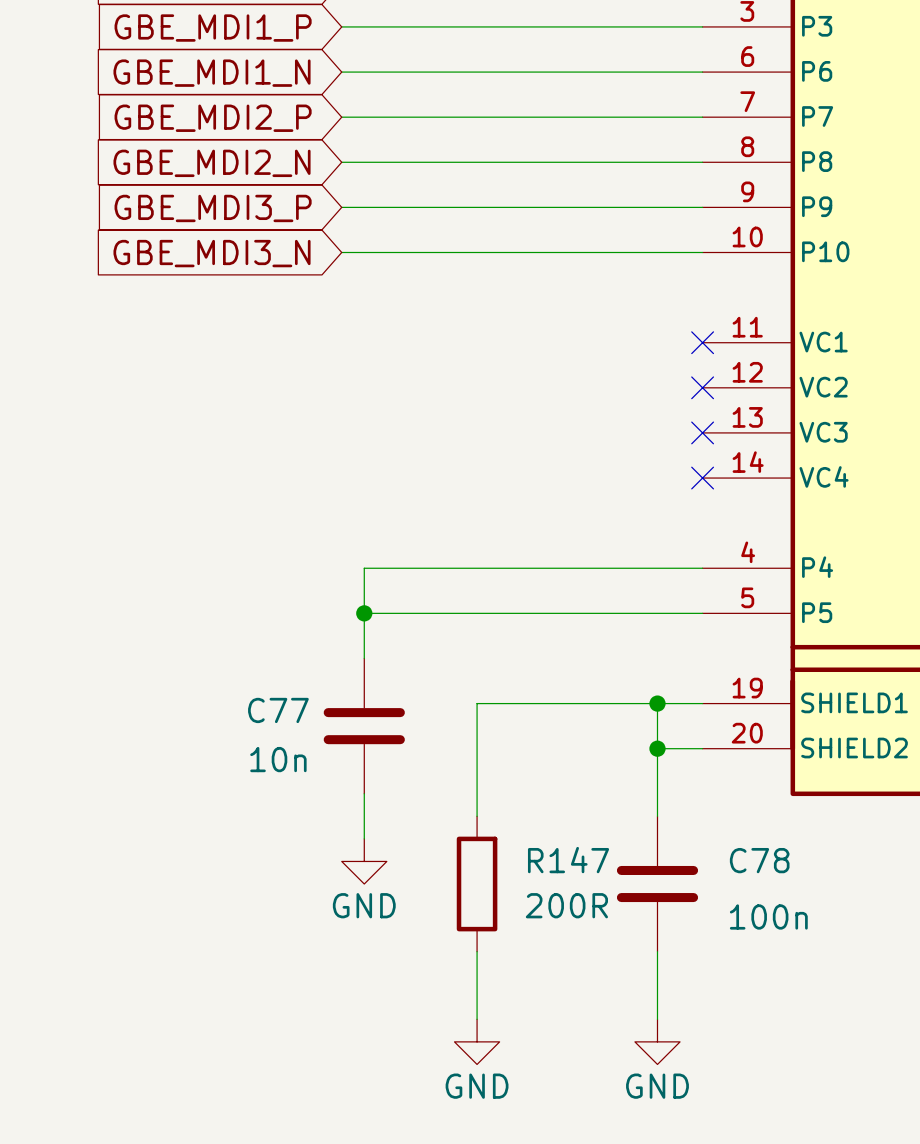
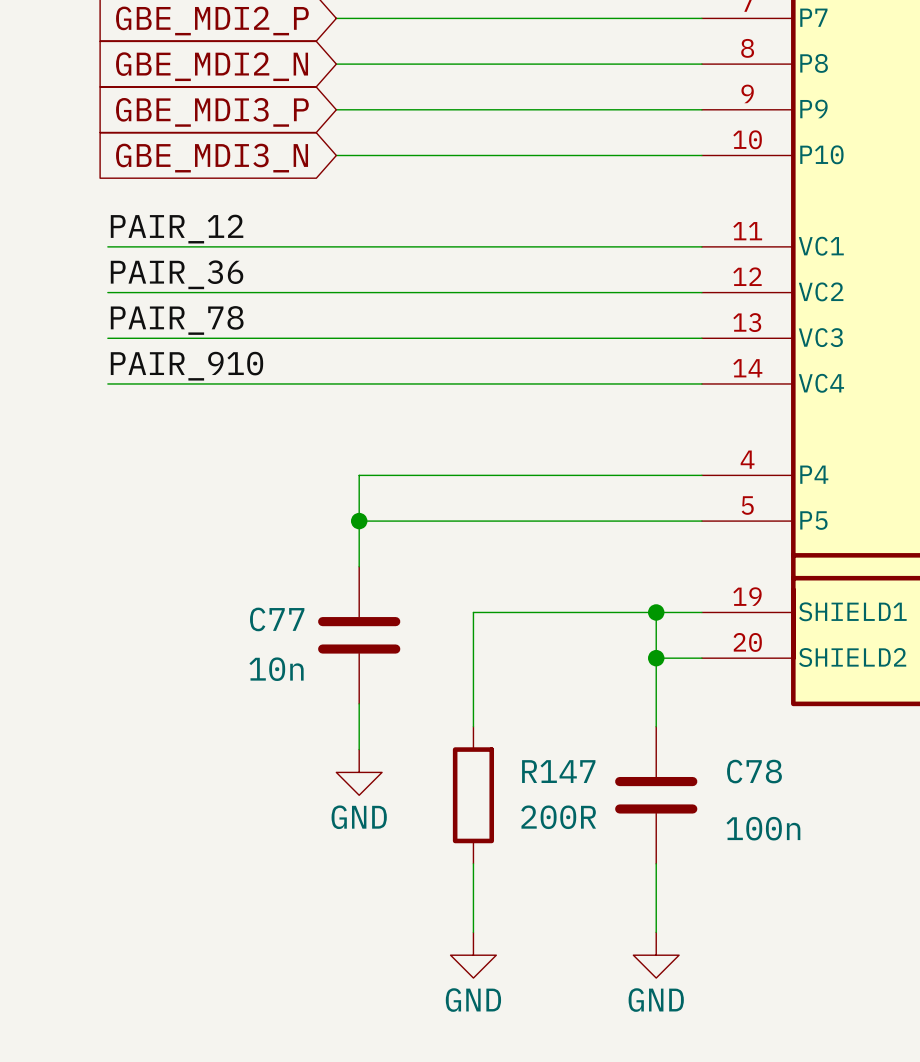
label: none -> PAIR_12 (177, 229)
wire: none -> (107, 246) (701, 246)
no-connect mark: (702, 342) -> none
label: none -> PAIR_36 (177, 274)
wire: none -> (107, 292) (701, 292)
no-connect mark: (702, 387) -> none
label: none -> PAIR_78 (177, 320)
wire: none -> (107, 338) (701, 338)
no-connect mark: (702, 432) -> none
label: none -> PAIR_910 (186, 366)
wire: none -> (107, 383) (701, 383)
no-connect mark: (702, 478) -> none

